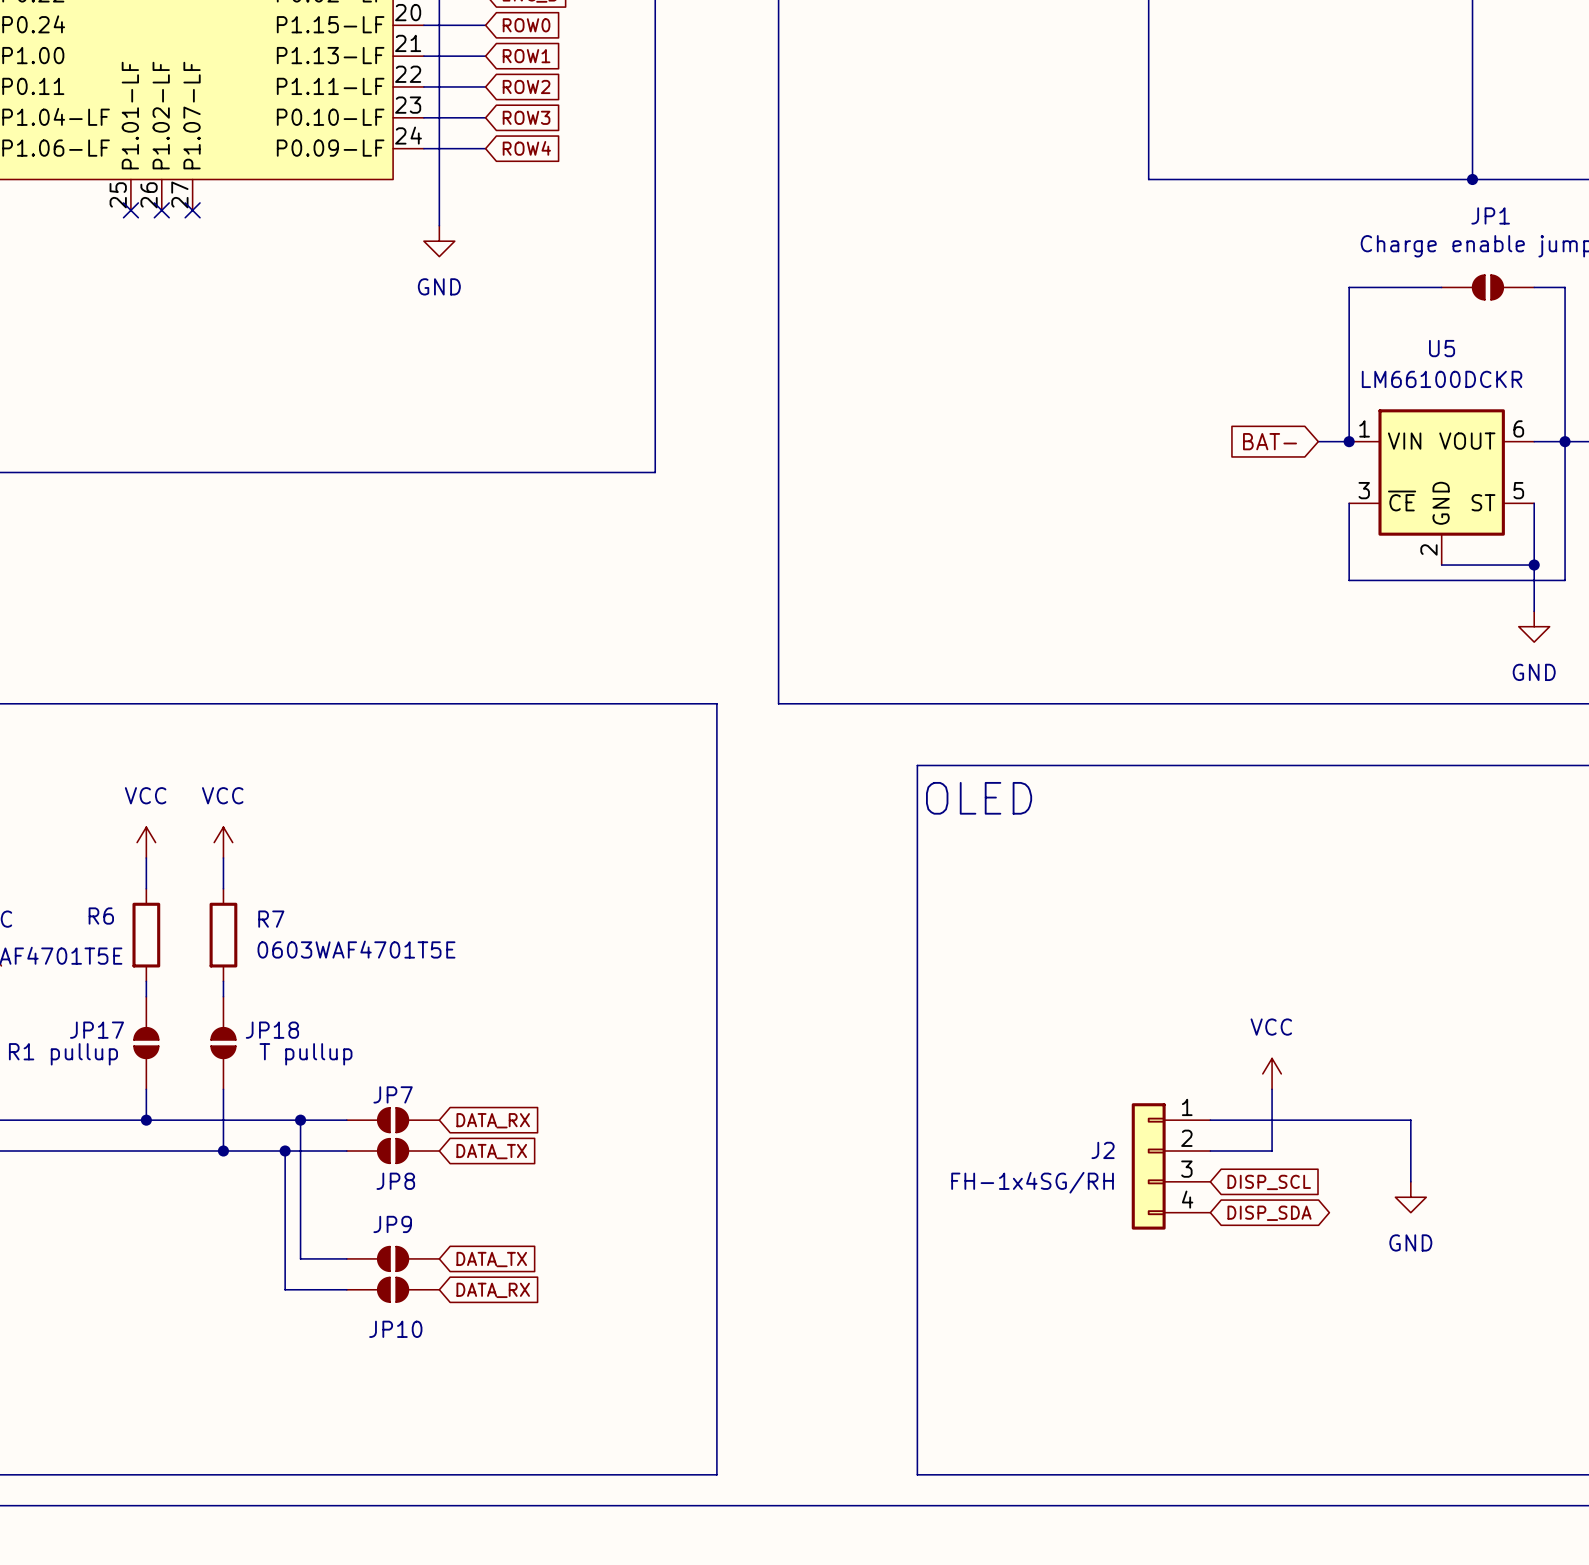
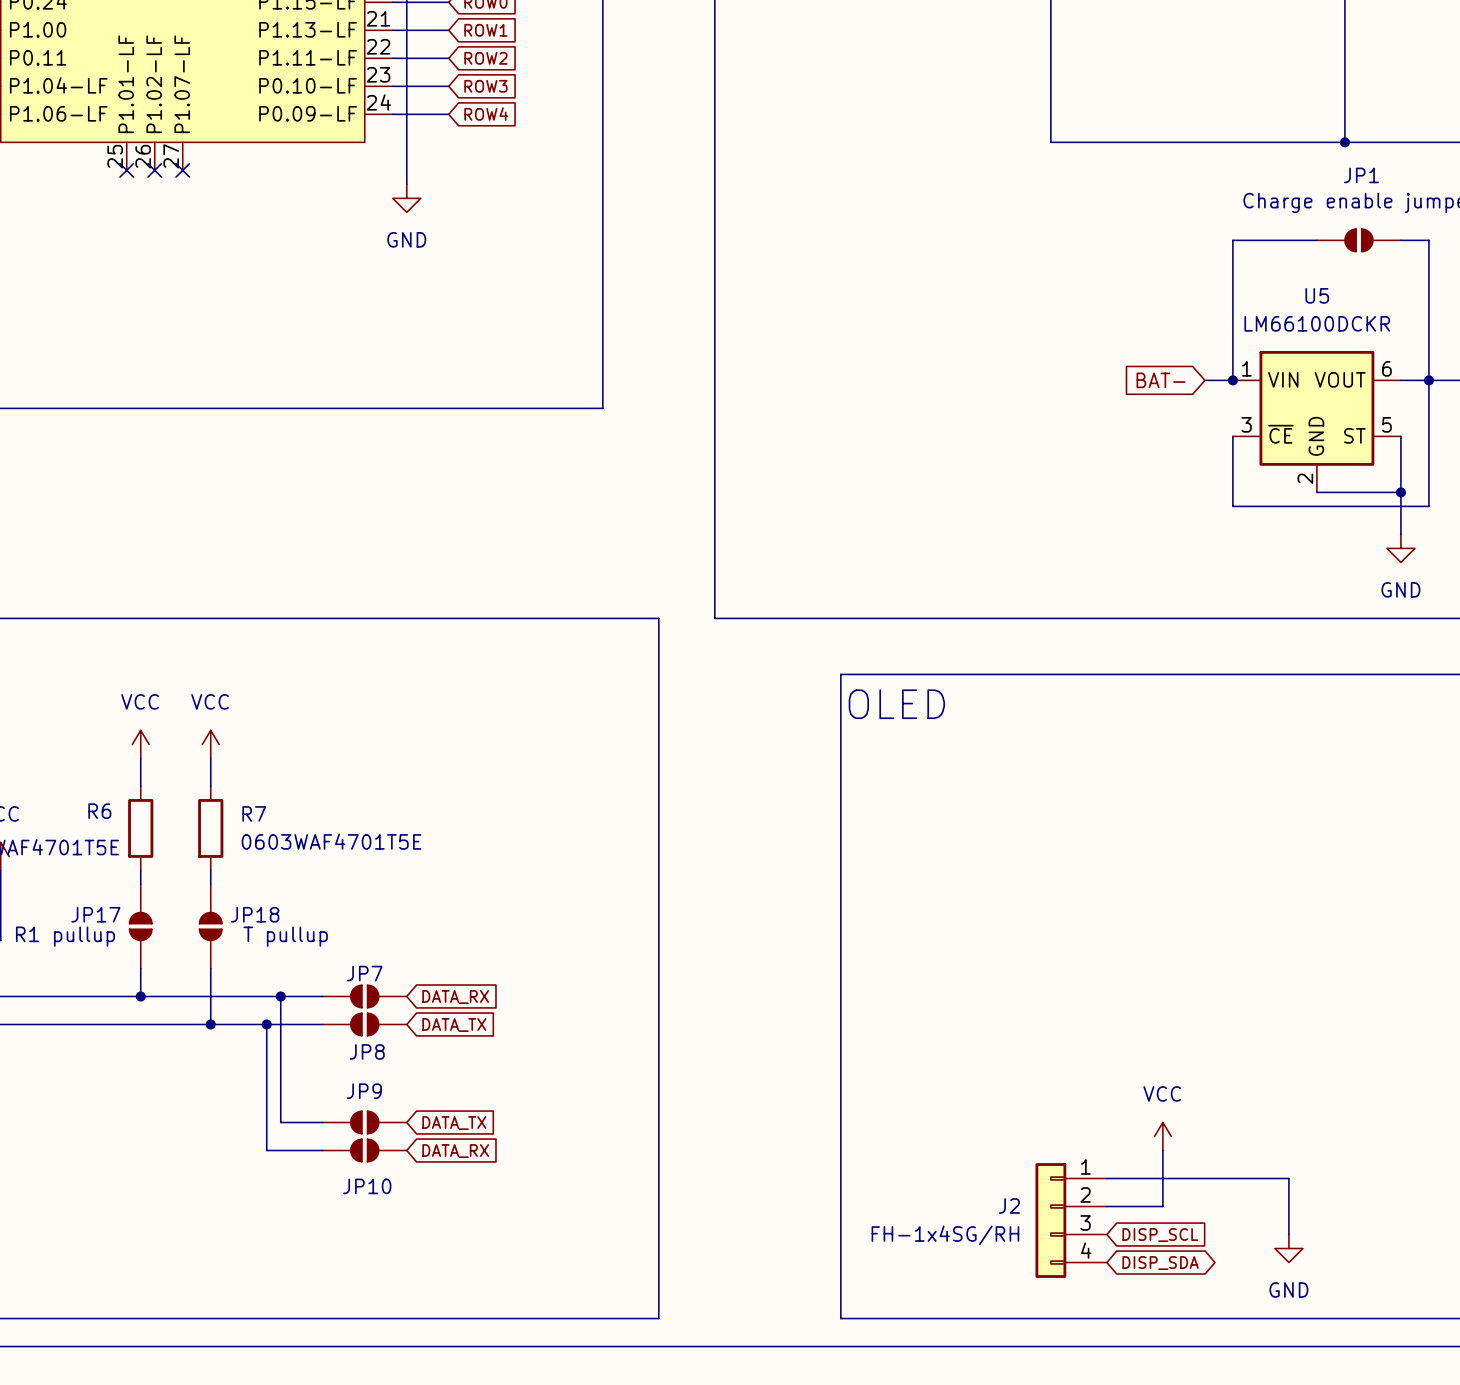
power symbol position: VCC (1272, 1073) -> VCC (1162, 1136)
wire: (1272, 1089) (1272, 1151) (1210, 1151) -> (1162, 1150) (1162, 1206) (1106, 1206)
wire: (1210, 1120) (1410, 1120) (1410, 1181) -> (1106, 1178) (1288, 1178) (1288, 1234)
J2 position: (1171, 1166) -> (1071, 1220)
global label position: DISP_SCL (1269, 1182) -> DISP_SCL (1160, 1235)
power symbol position: GND (1410, 1197) -> GND (1288, 1248)
global label position: DISP_SDA (1269, 1213) -> DISP_SDA (1160, 1263)

